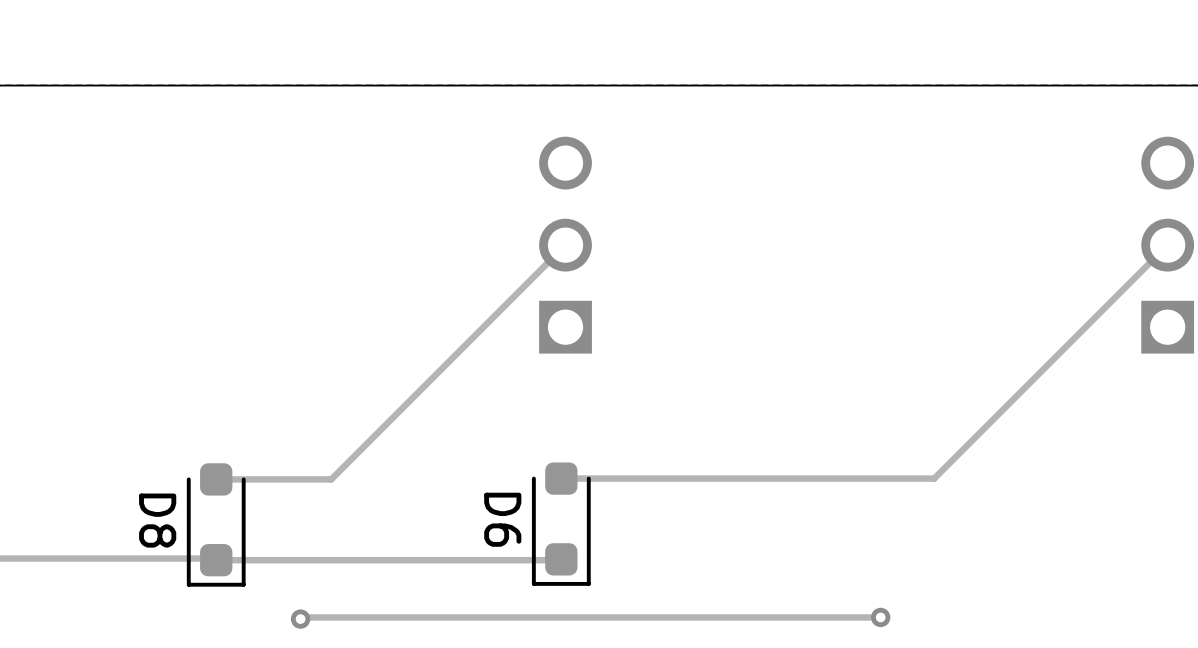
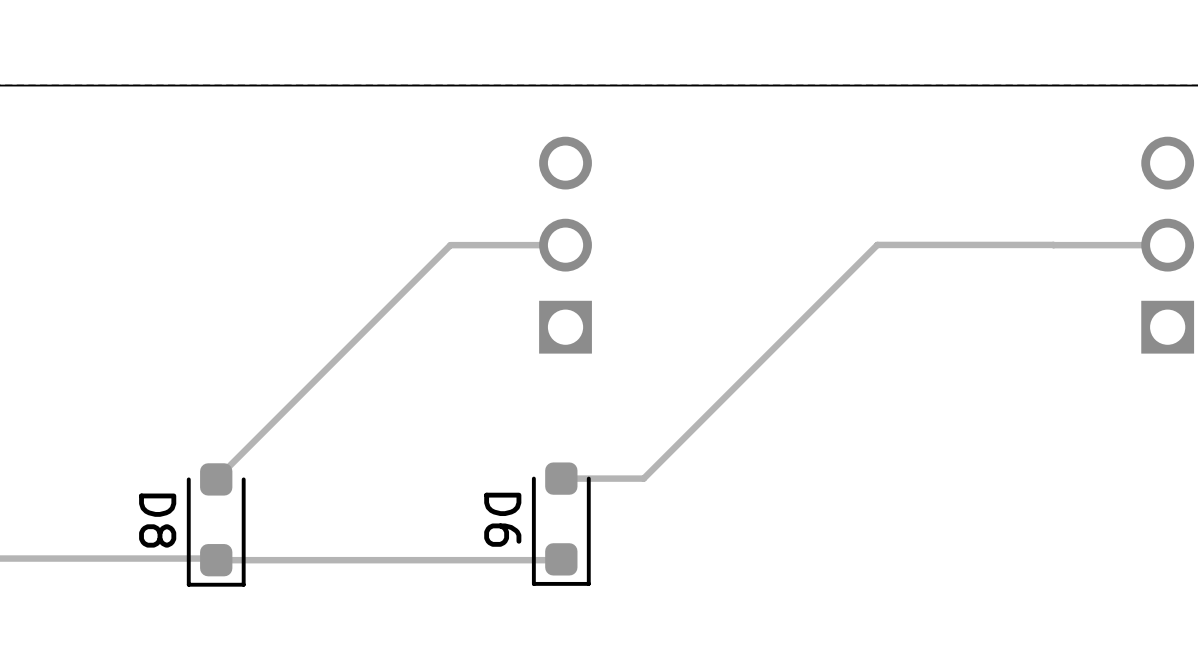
track: (565, 245) (331, 479) (216, 479) -> (565, 245) (450, 245) (216, 479)
track: (1167, 245) (934, 478) (643, 478) -> (1053, 244) (877, 244) (643, 478)
track: none -> (1167, 245) (1053, 245)
track: (880, 617) (302, 617) (300, 619) -> none
via: (880, 617) -> none
via: (300, 619) -> none

